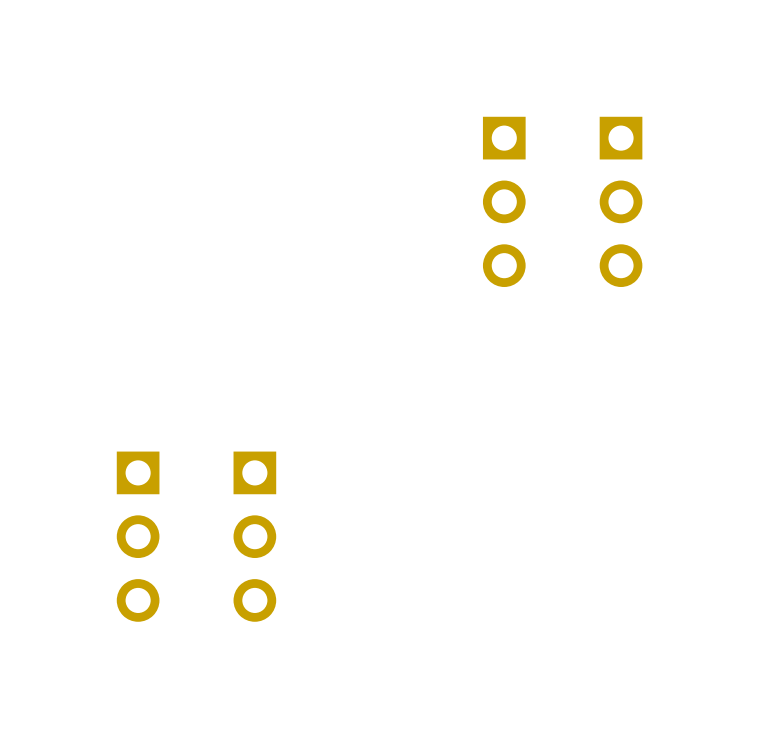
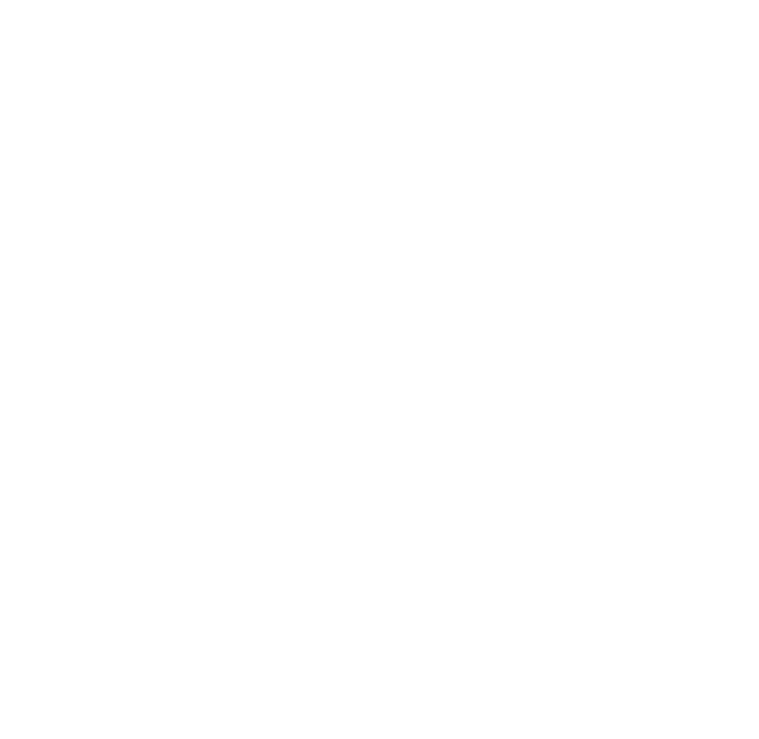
part: (504, 201) -> none
part: (621, 201) -> none
part: (138, 536) -> none
part: (254, 536) -> none

